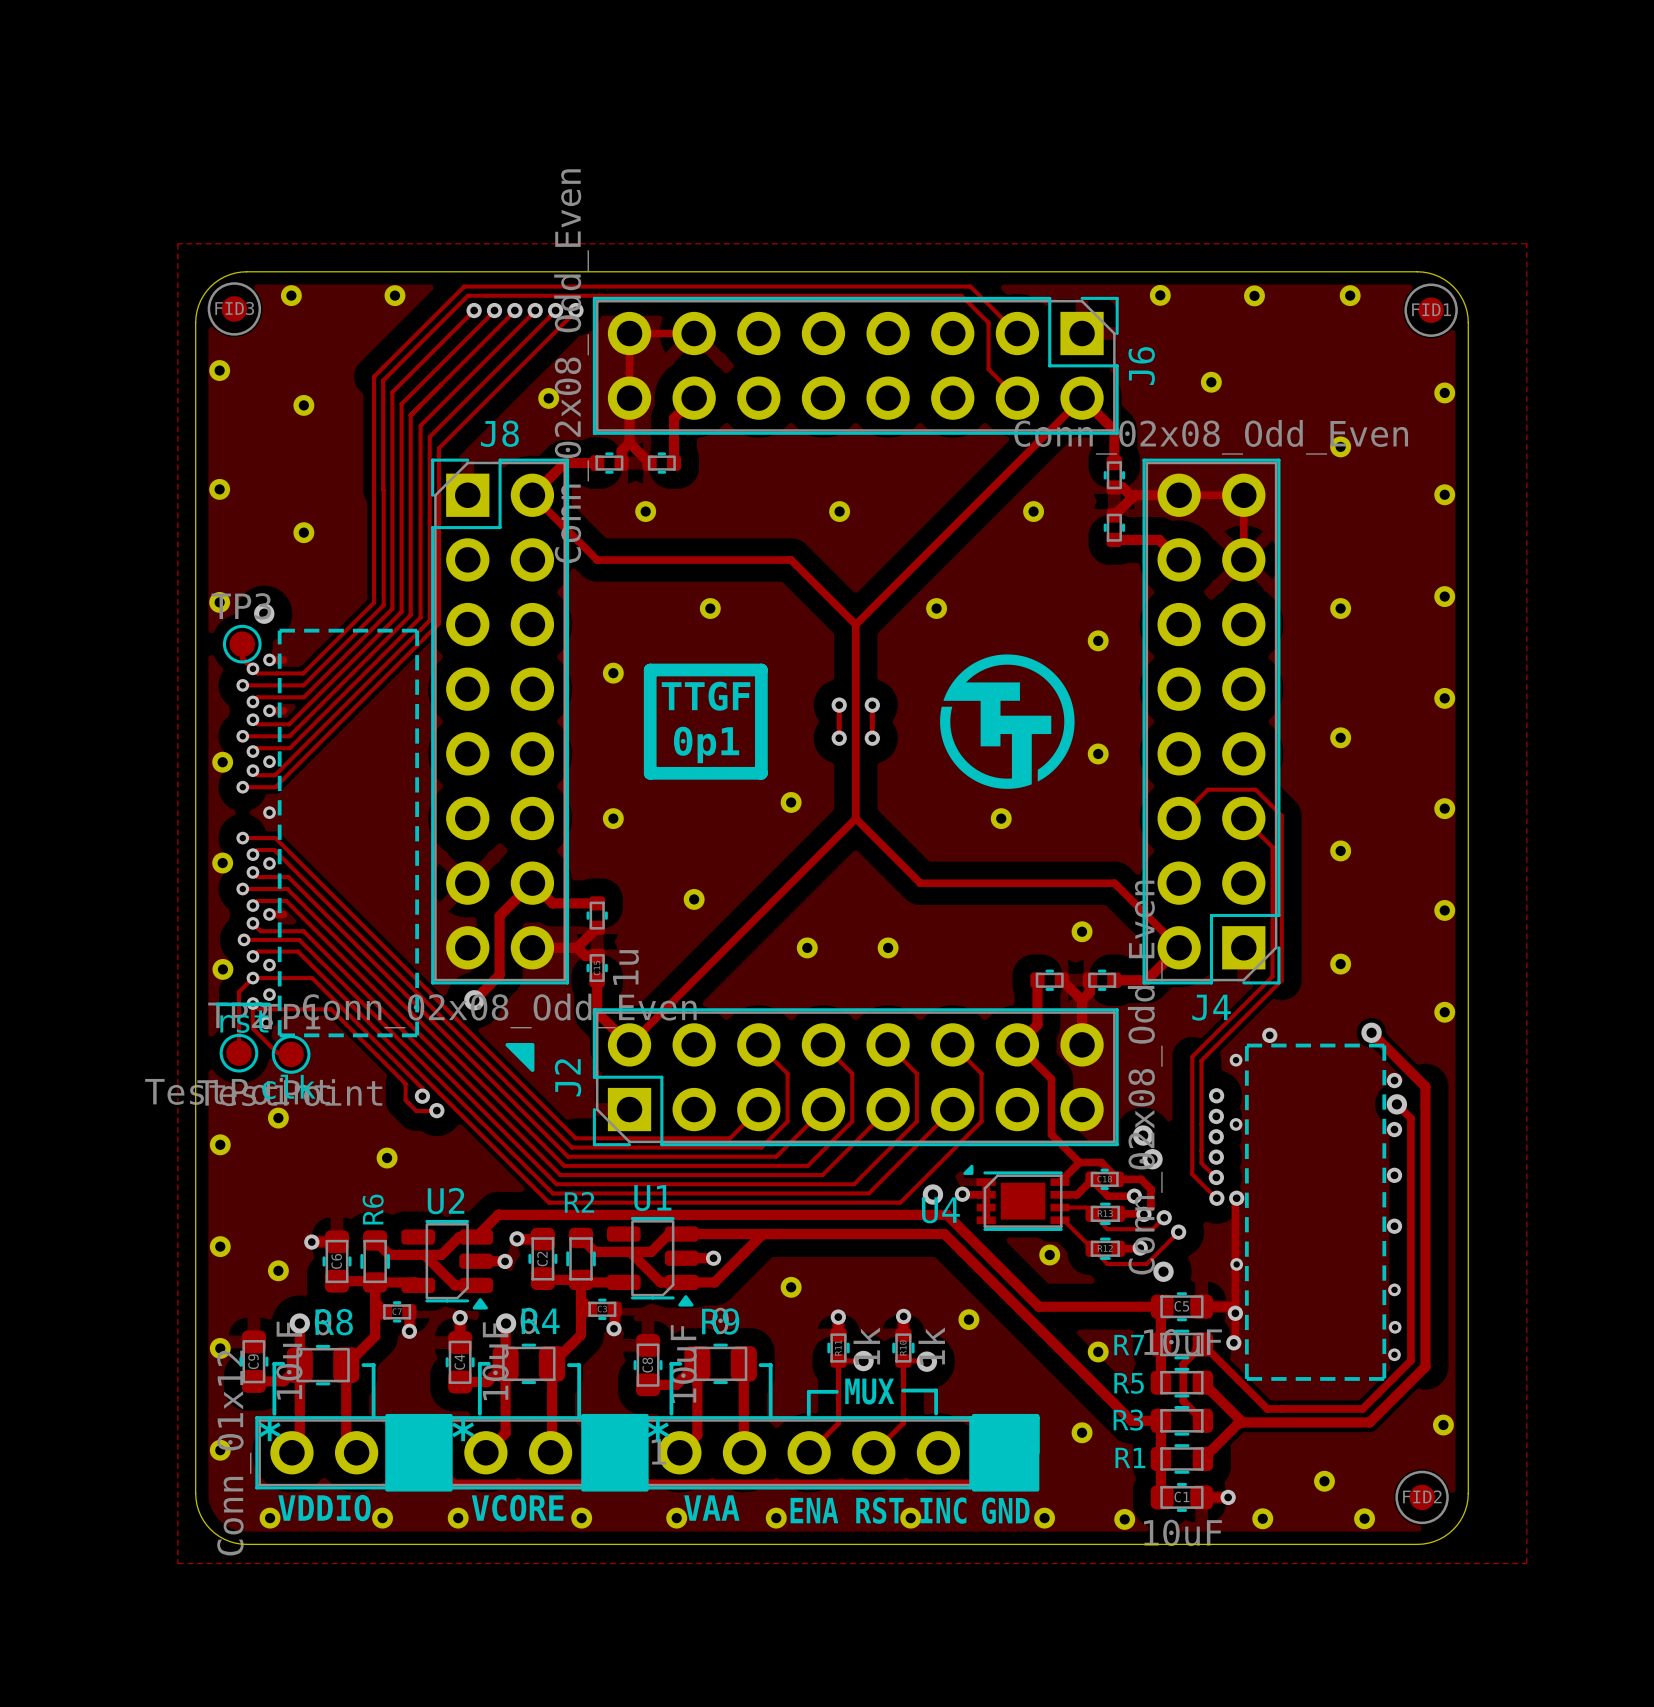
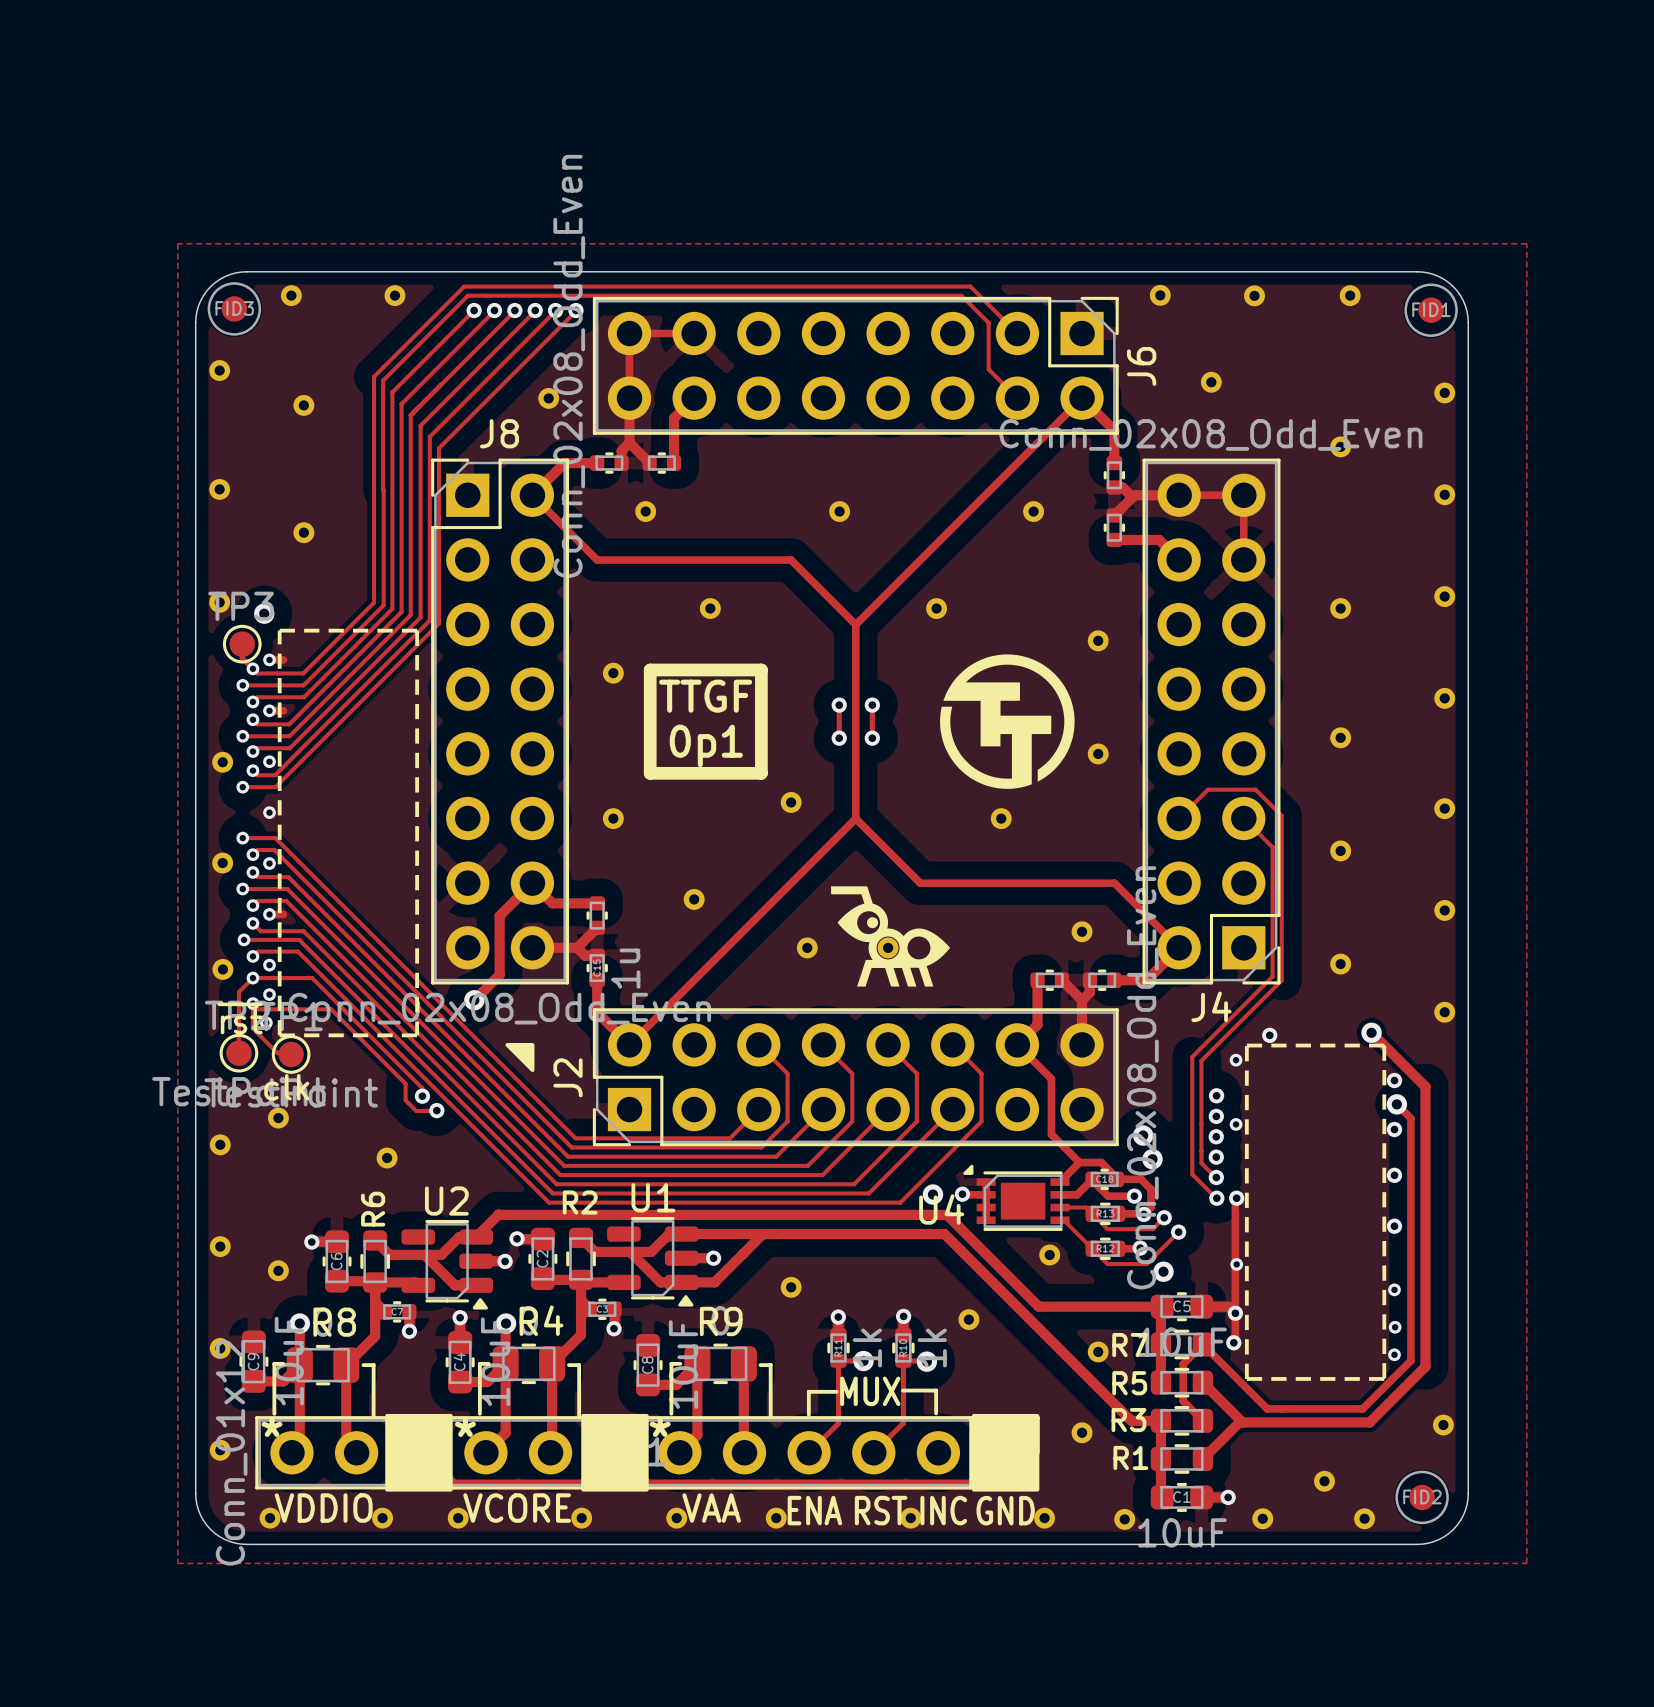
drawing: none -> [831, 886, 951, 987]

